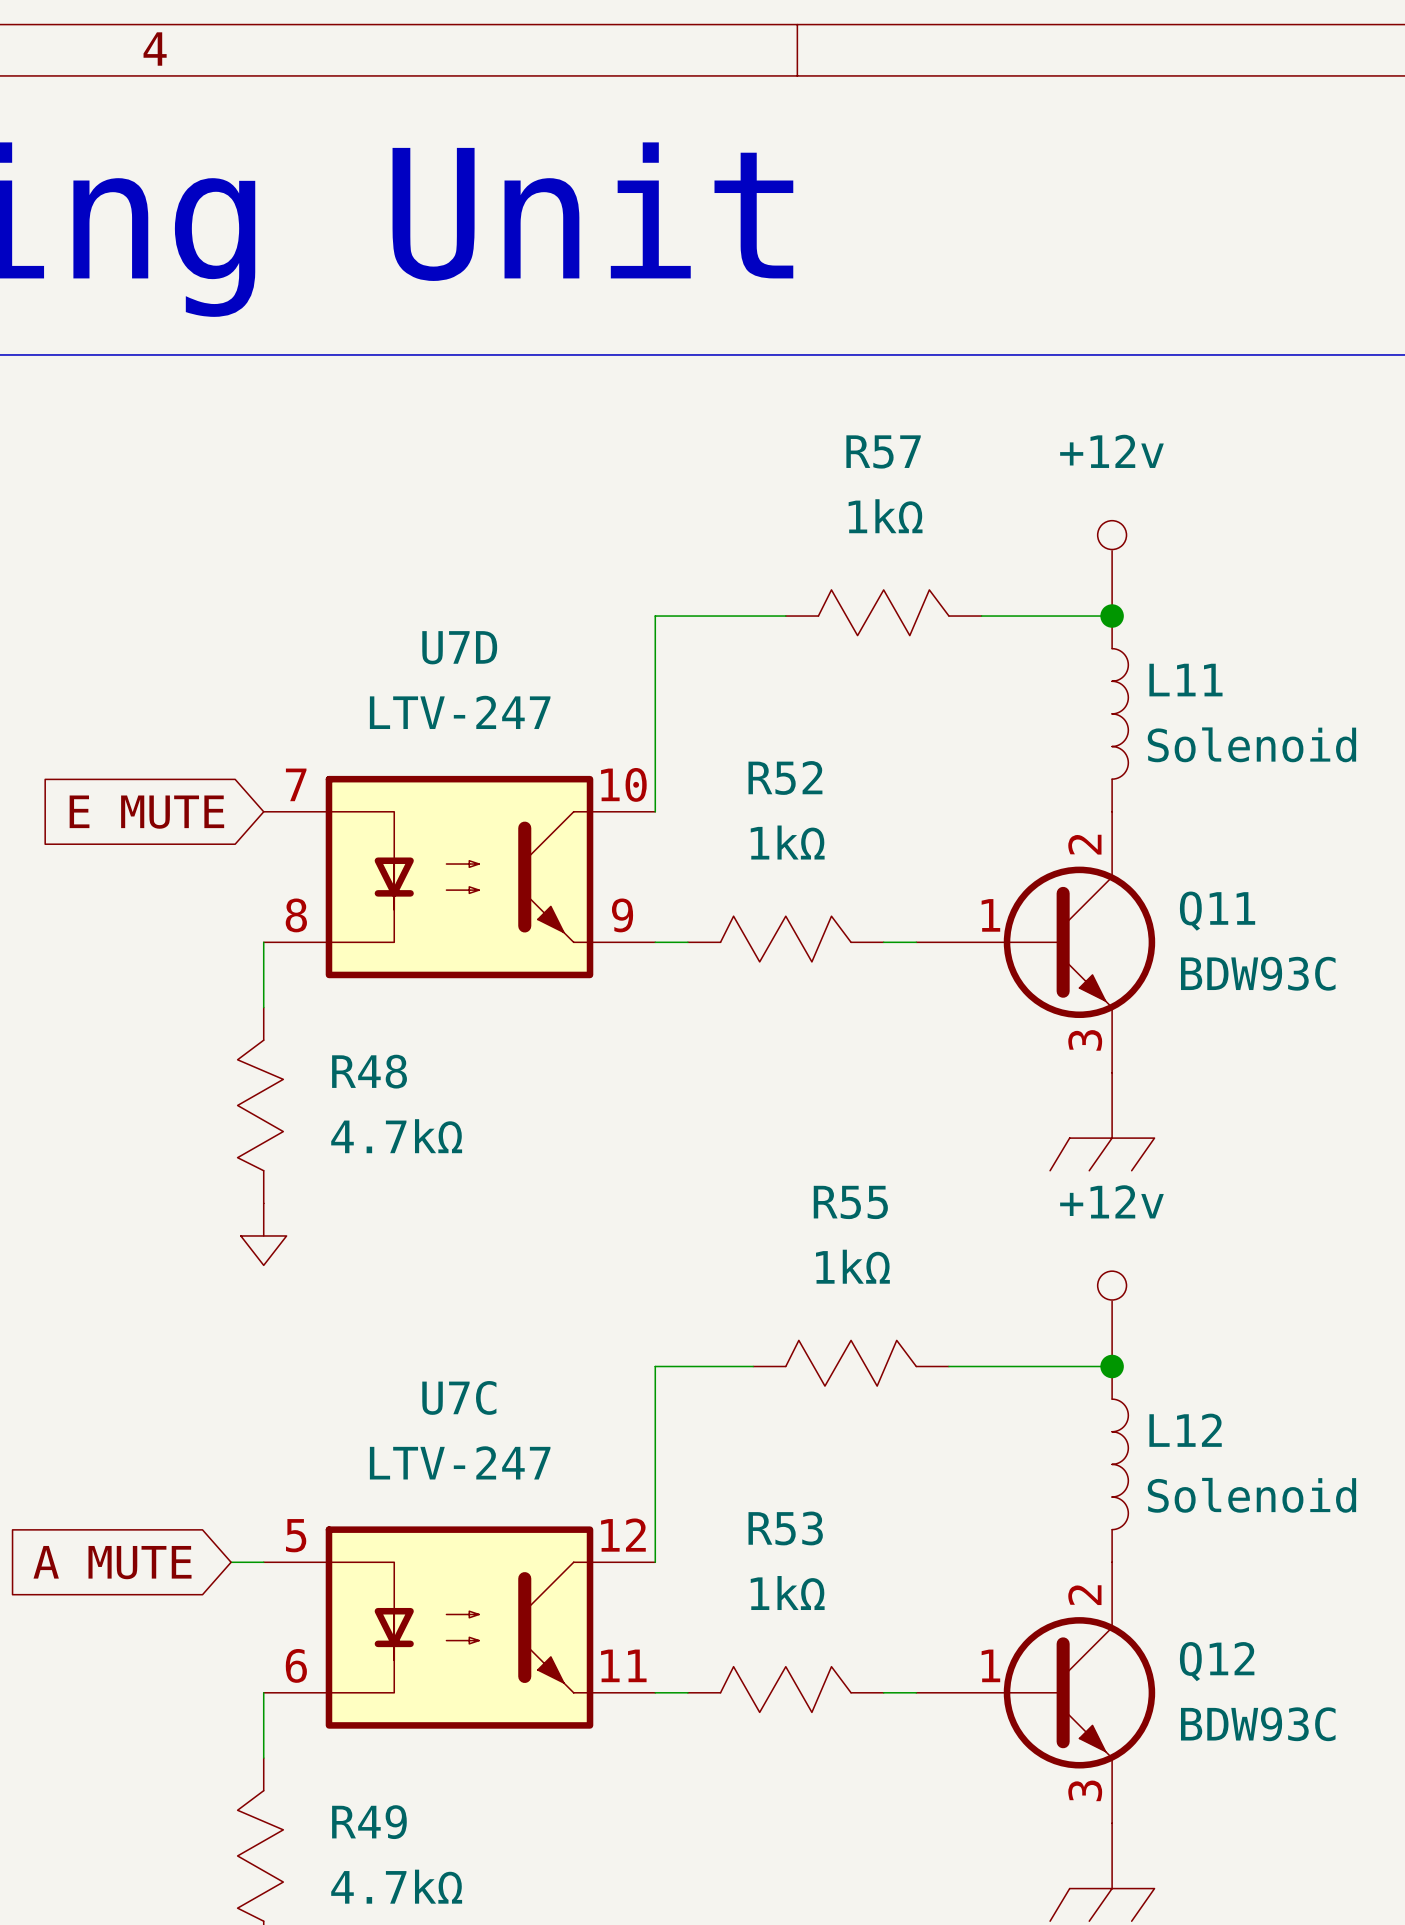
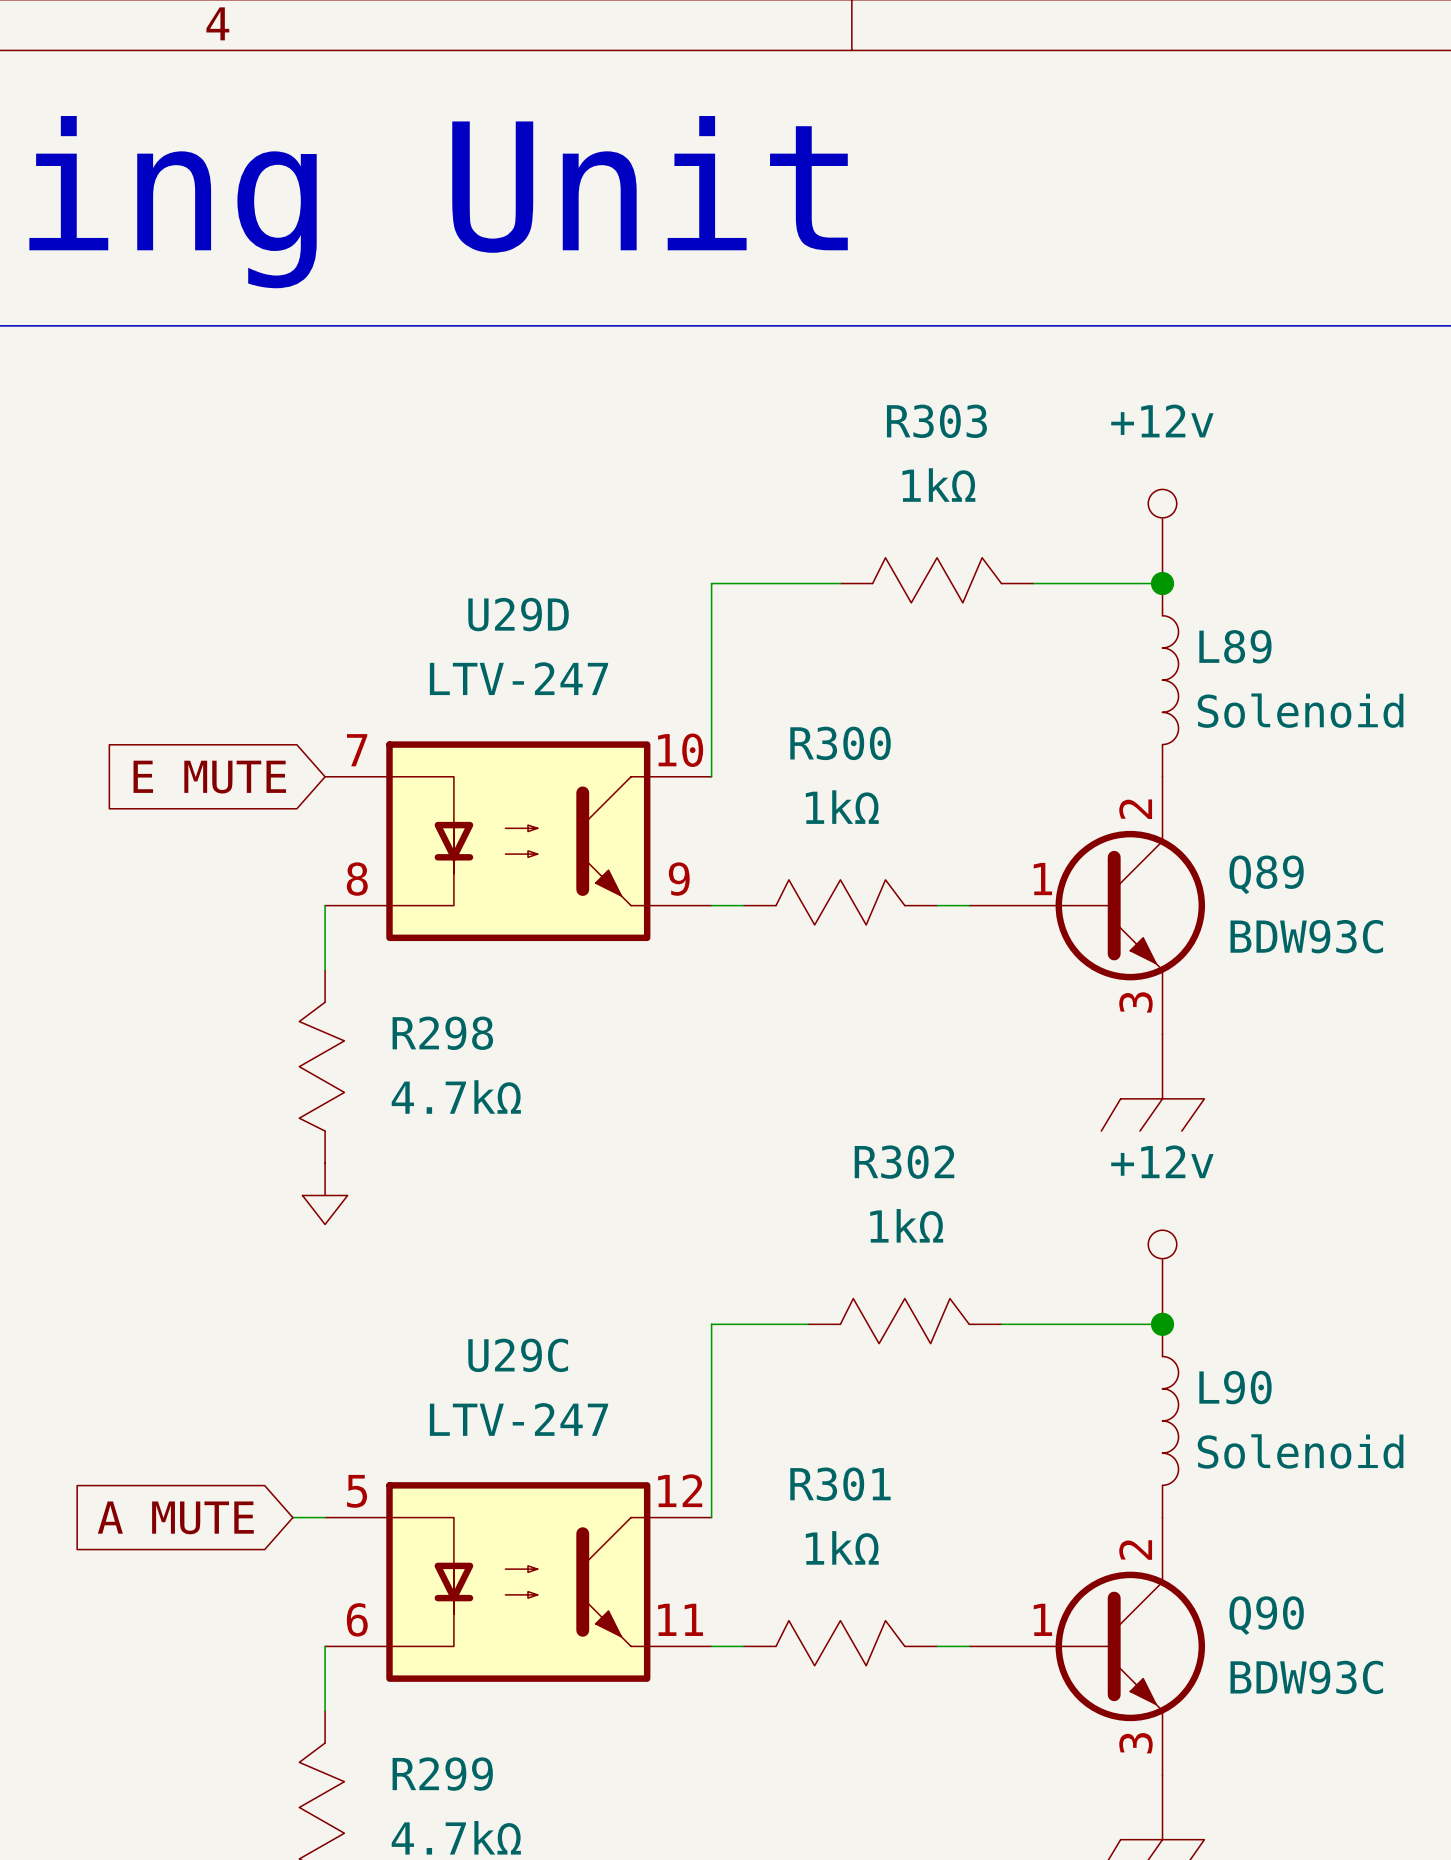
R57 name: R57 (883, 451) -> R303 (936, 421)
U7D name: U7D (459, 647) -> U29D (518, 614)
L11 name: L11 (1185, 680) -> L89 (1235, 646)
R52 name: R52 (785, 777) -> R300 (840, 743)
Q11 name: Q11 (1217, 911) -> Q89 (1266, 874)
R48 name: R48 (369, 1071) -> R298 (442, 1033)
R55 name: R55 (850, 1202) -> R302 (904, 1162)
U7C name: U7C (459, 1397) -> U29C (518, 1355)
L12 name: L12 (1185, 1430) -> L90 (1235, 1387)
R53 name: R53 (785, 1528) -> R301 (840, 1484)
Q12 name: Q12 (1217, 1661) -> Q90 (1266, 1615)
R49 name: R49 (369, 1822) -> R299 (442, 1774)

